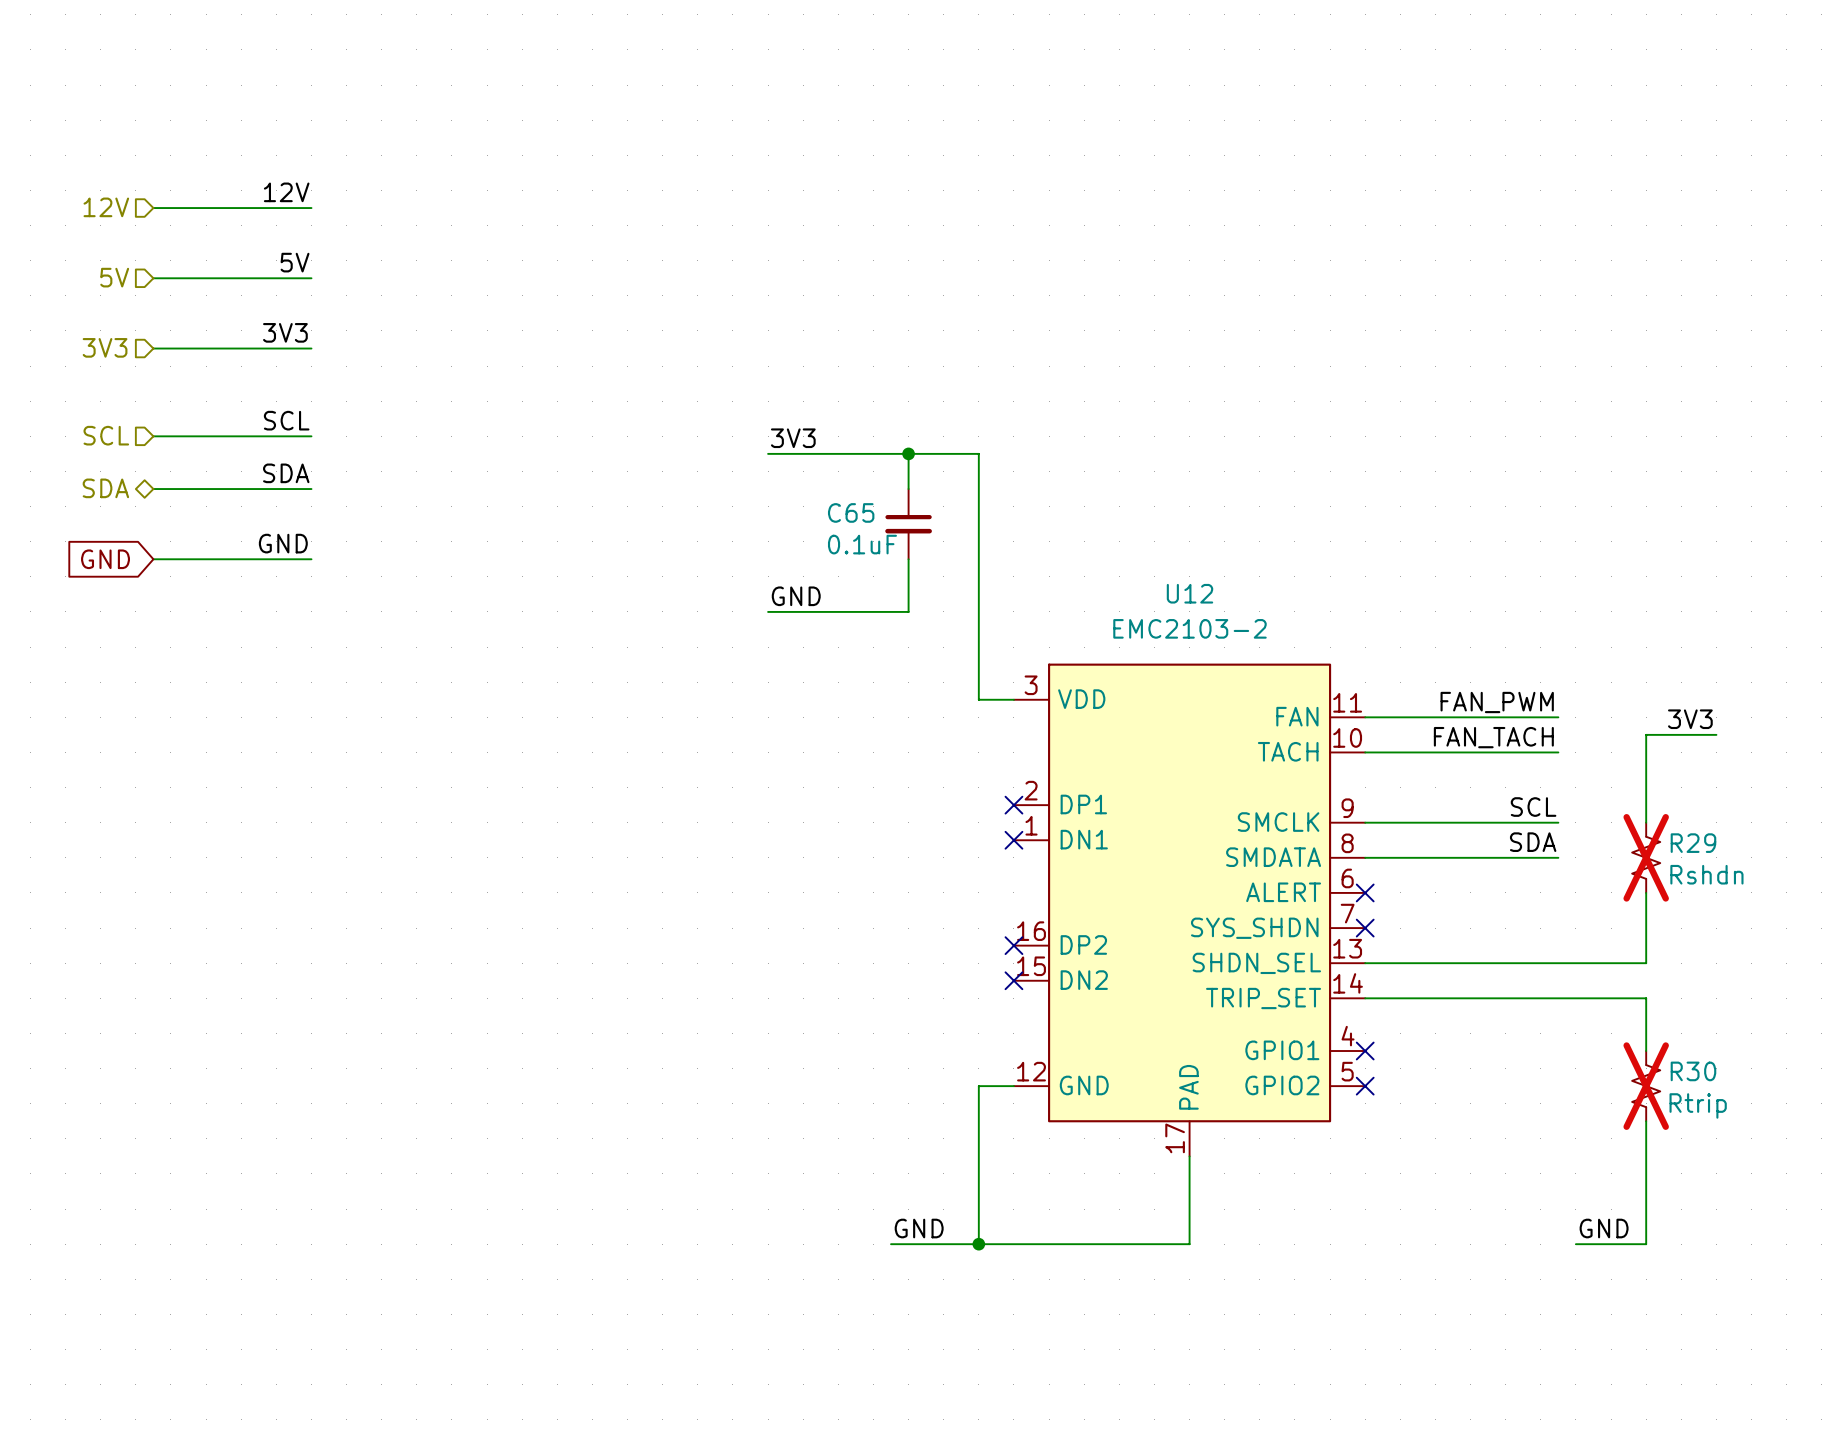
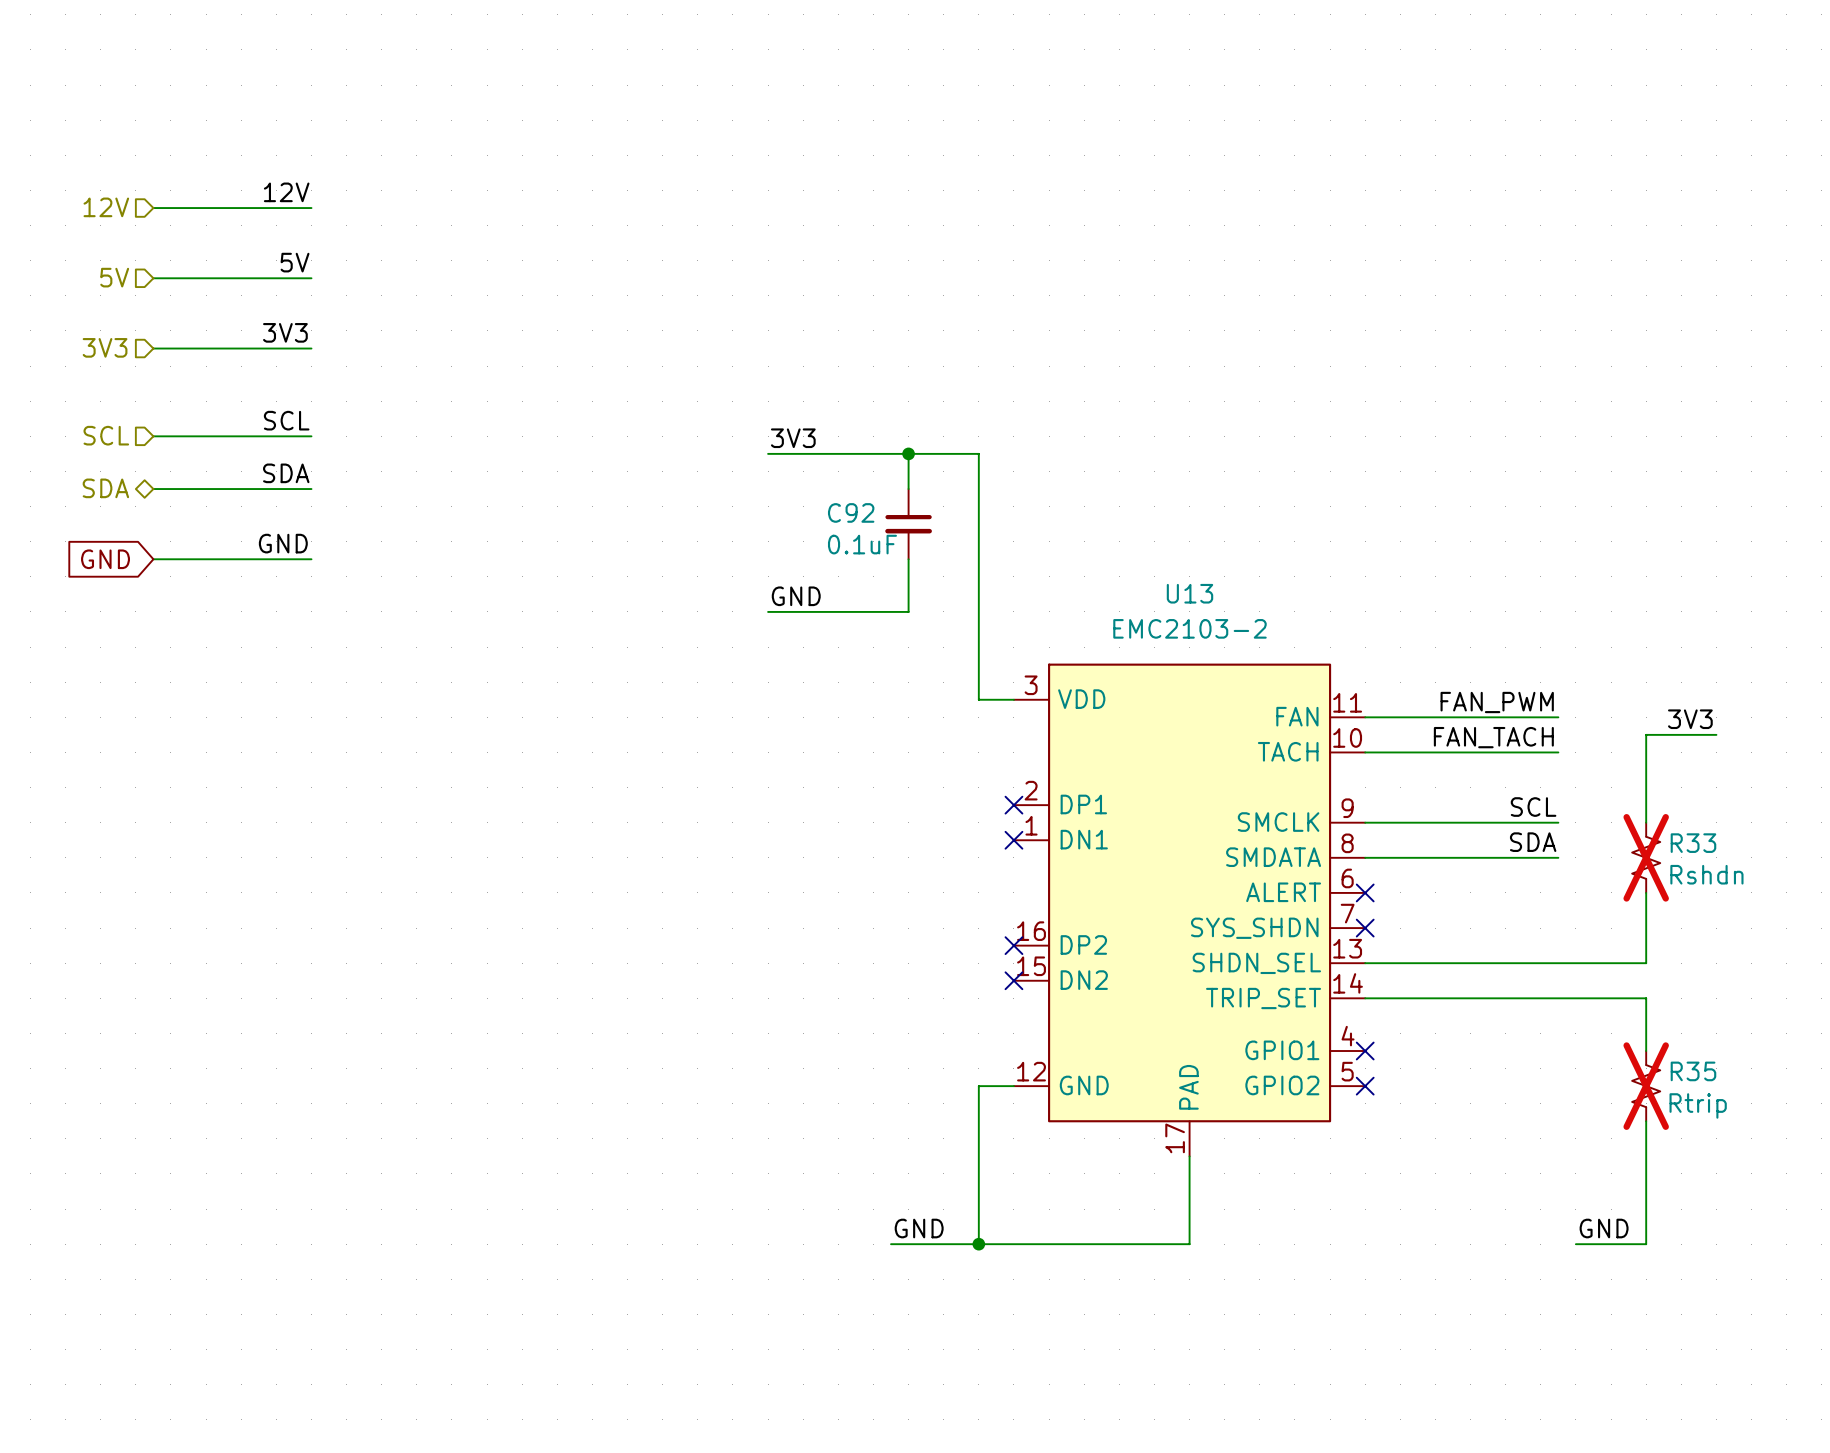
C65 name: C65 (851, 512) -> C92 (851, 512)
U12 name: U12 (1189, 593) -> U13 (1189, 593)
R29 name: R29 (1693, 843) -> R33 (1693, 843)
R30 name: R30 (1693, 1071) -> R35 (1693, 1071)

